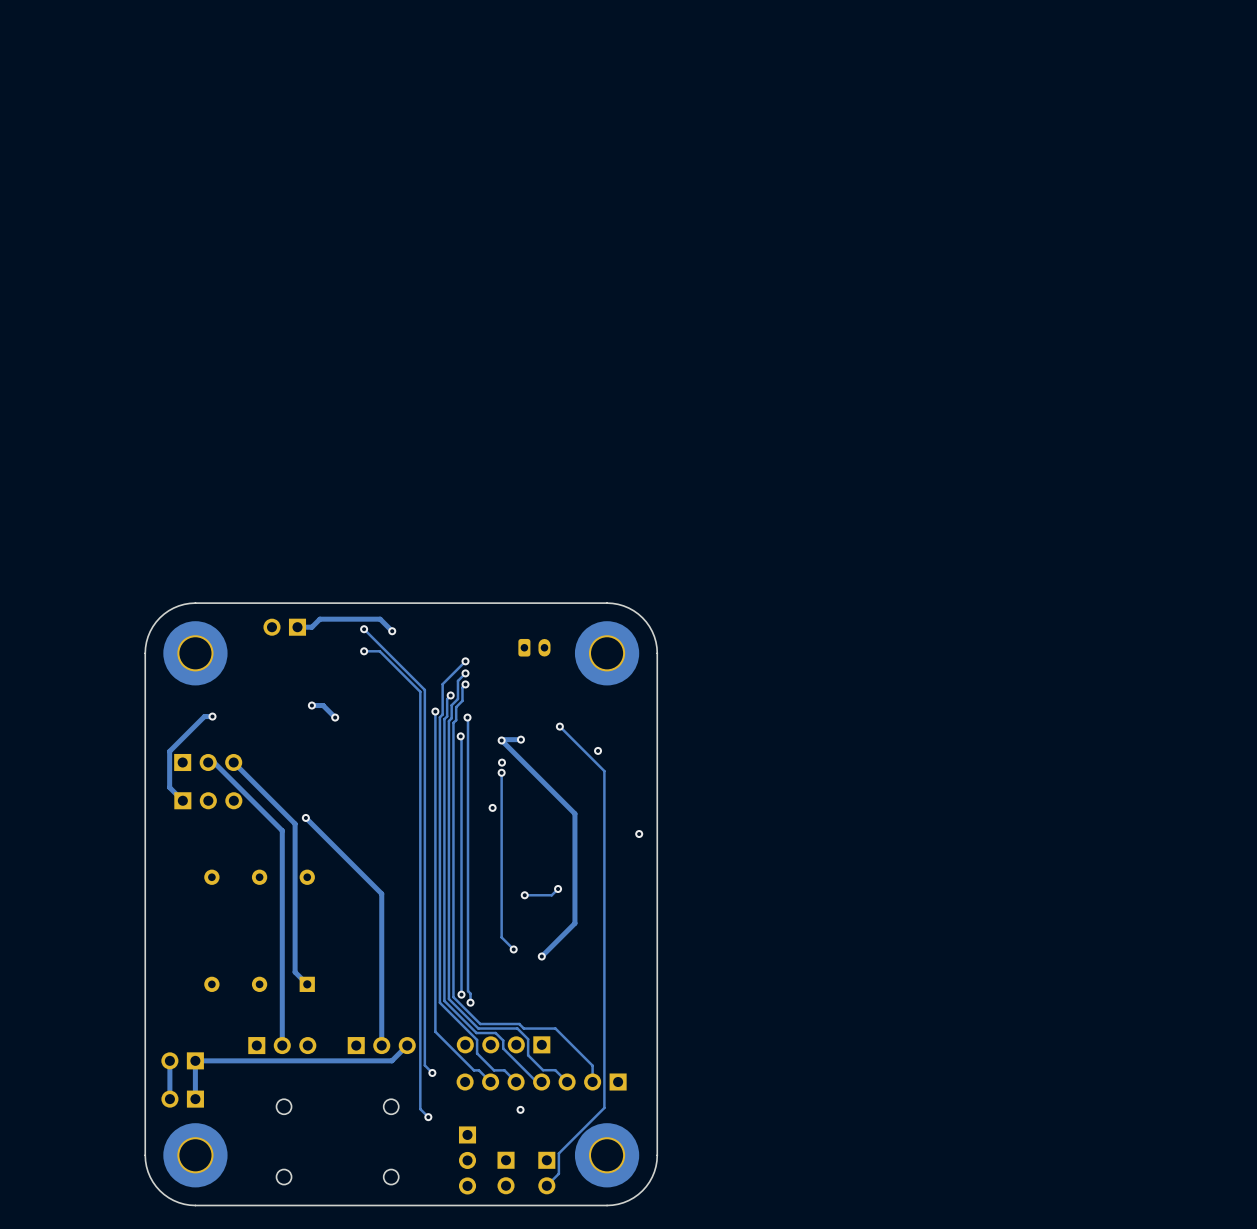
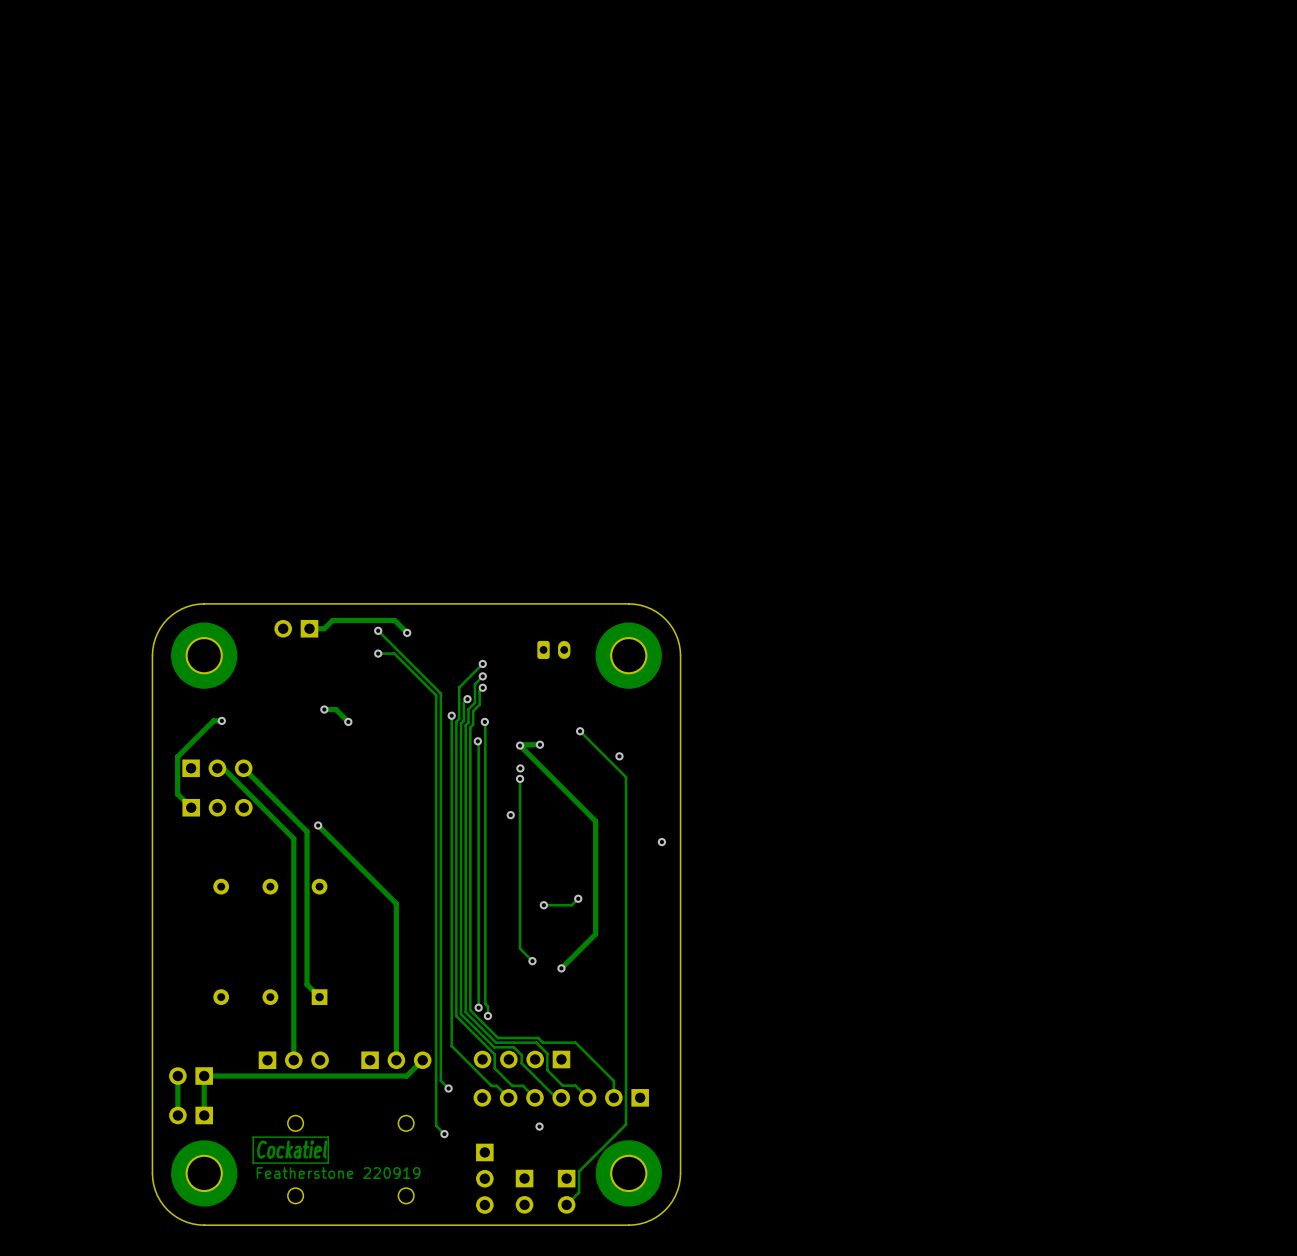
track: none -> (328, 1137) (253, 1137) (253, 1163) (328, 1163) (328, 1137)
text: none -> Cockatiel (292, 1149)
text: none -> Featherstone 220919 (338, 1173)

